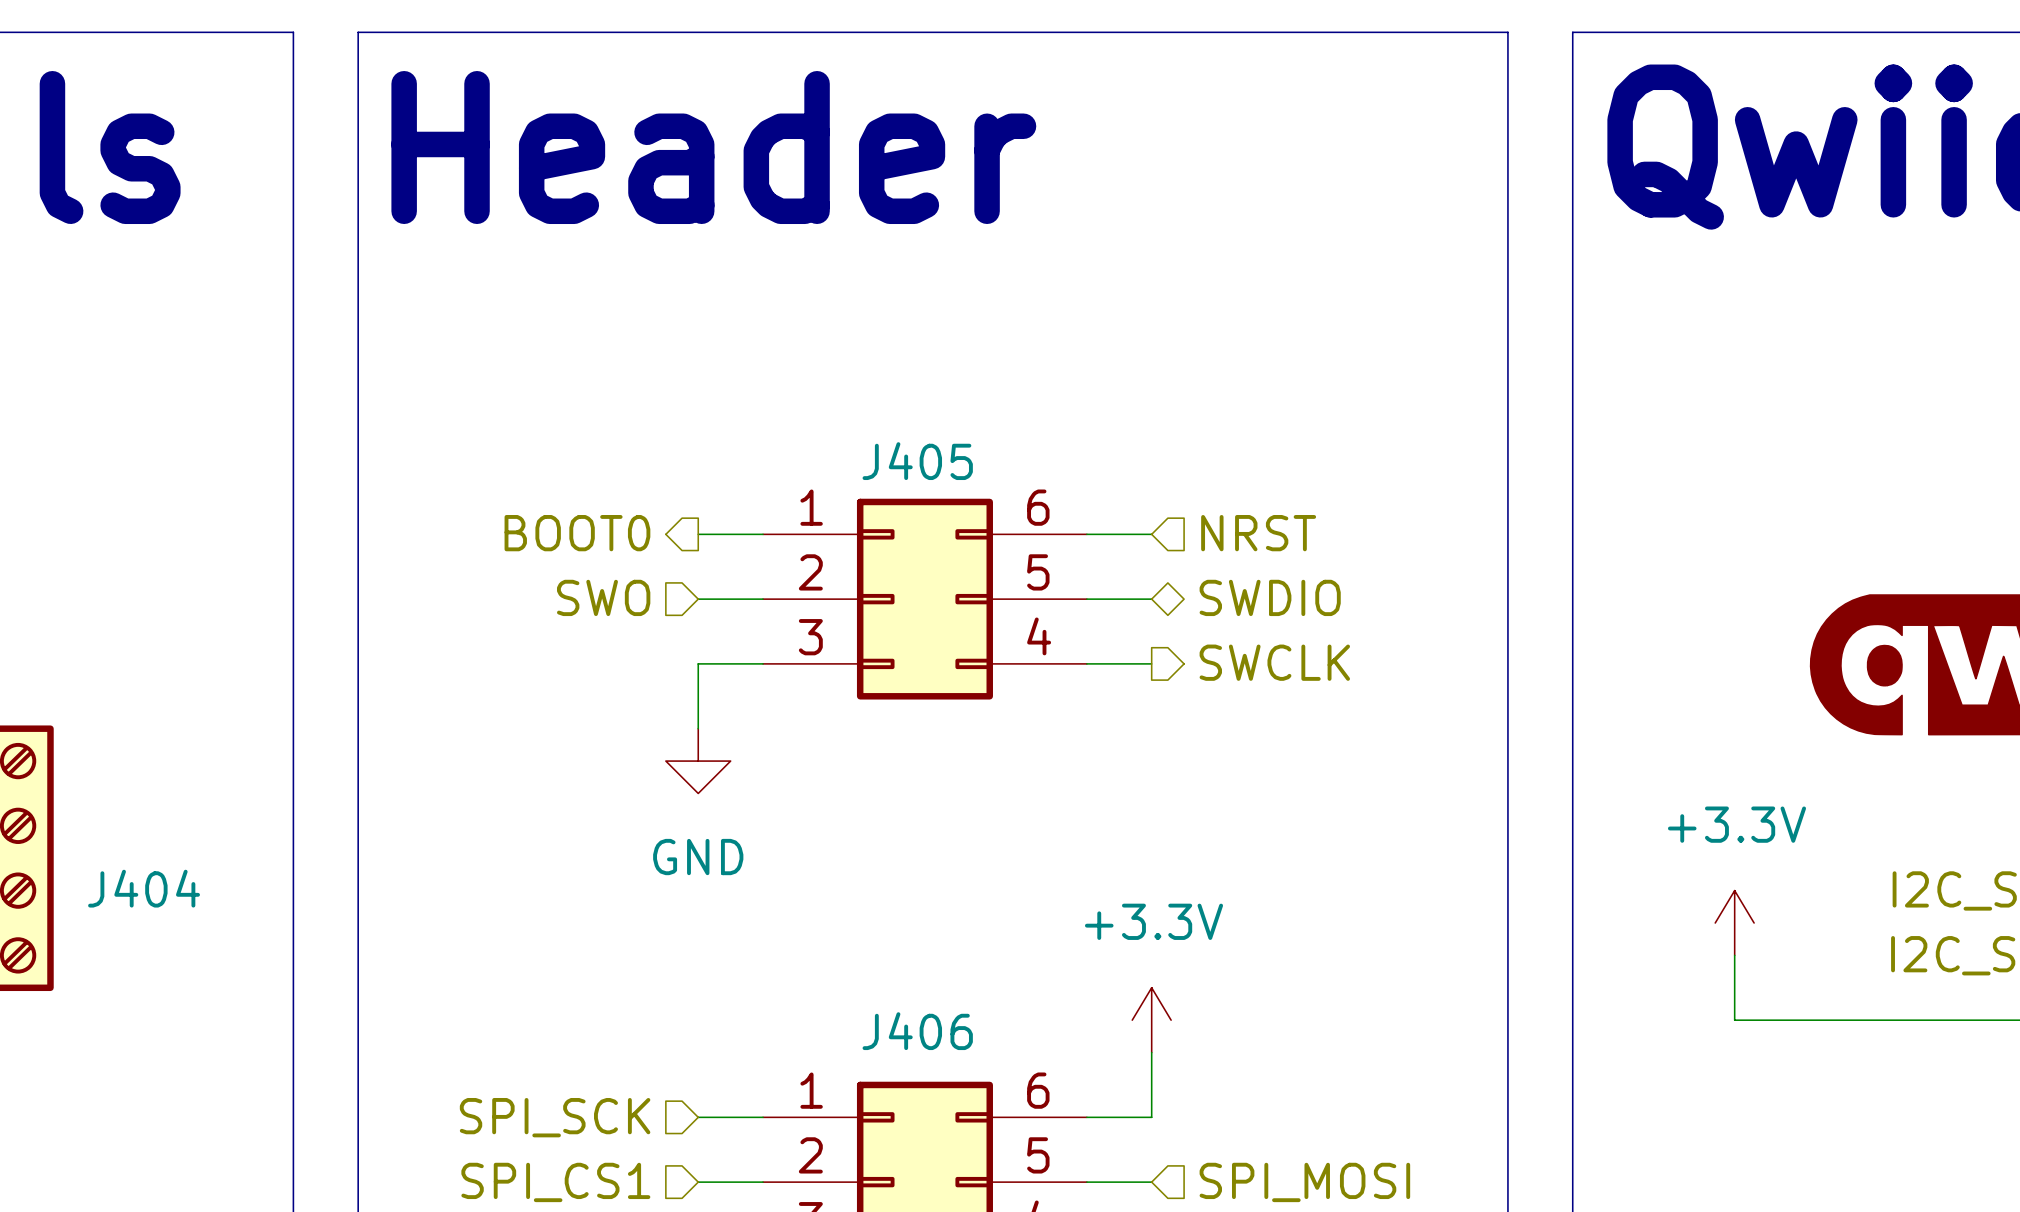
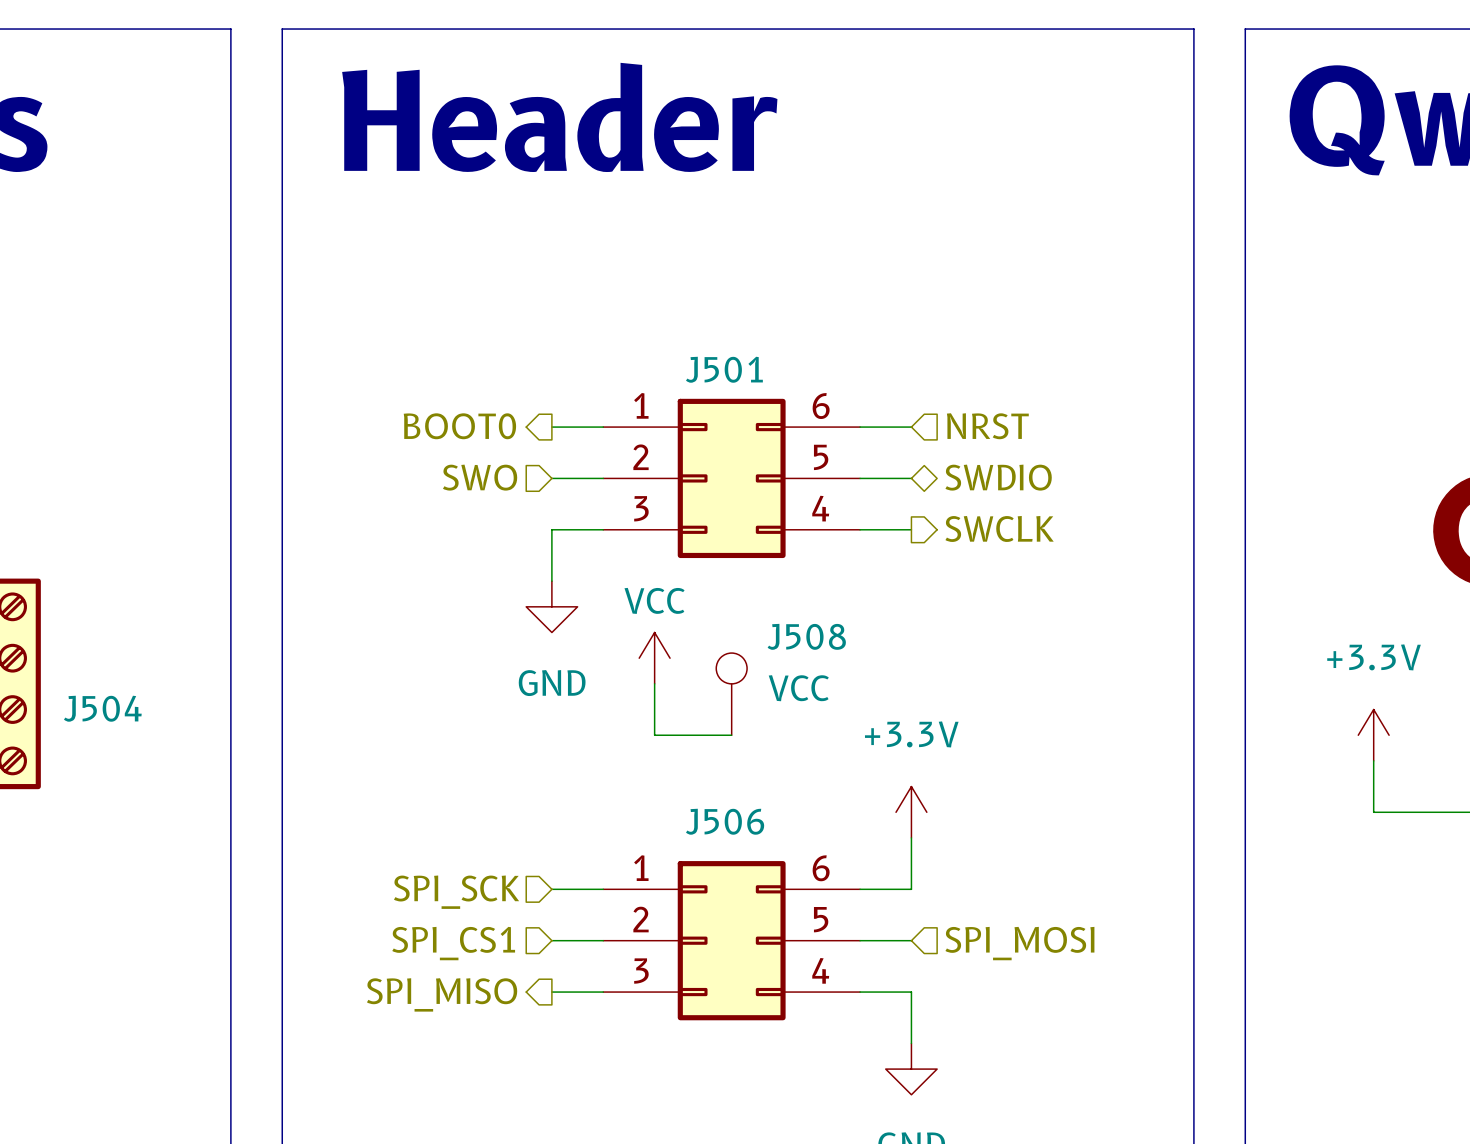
J405 name: J405 (917, 461) -> J501 (724, 369)
power symbol: none -> VCC (654, 658)
wire: none -> (654, 683) (654, 735) (731, 735)
J508: none -> VCC (731, 694)
J404 name: J404 (144, 888) -> J504 (102, 708)
J406 name: J406 (917, 1031) -> J506 (725, 821)

